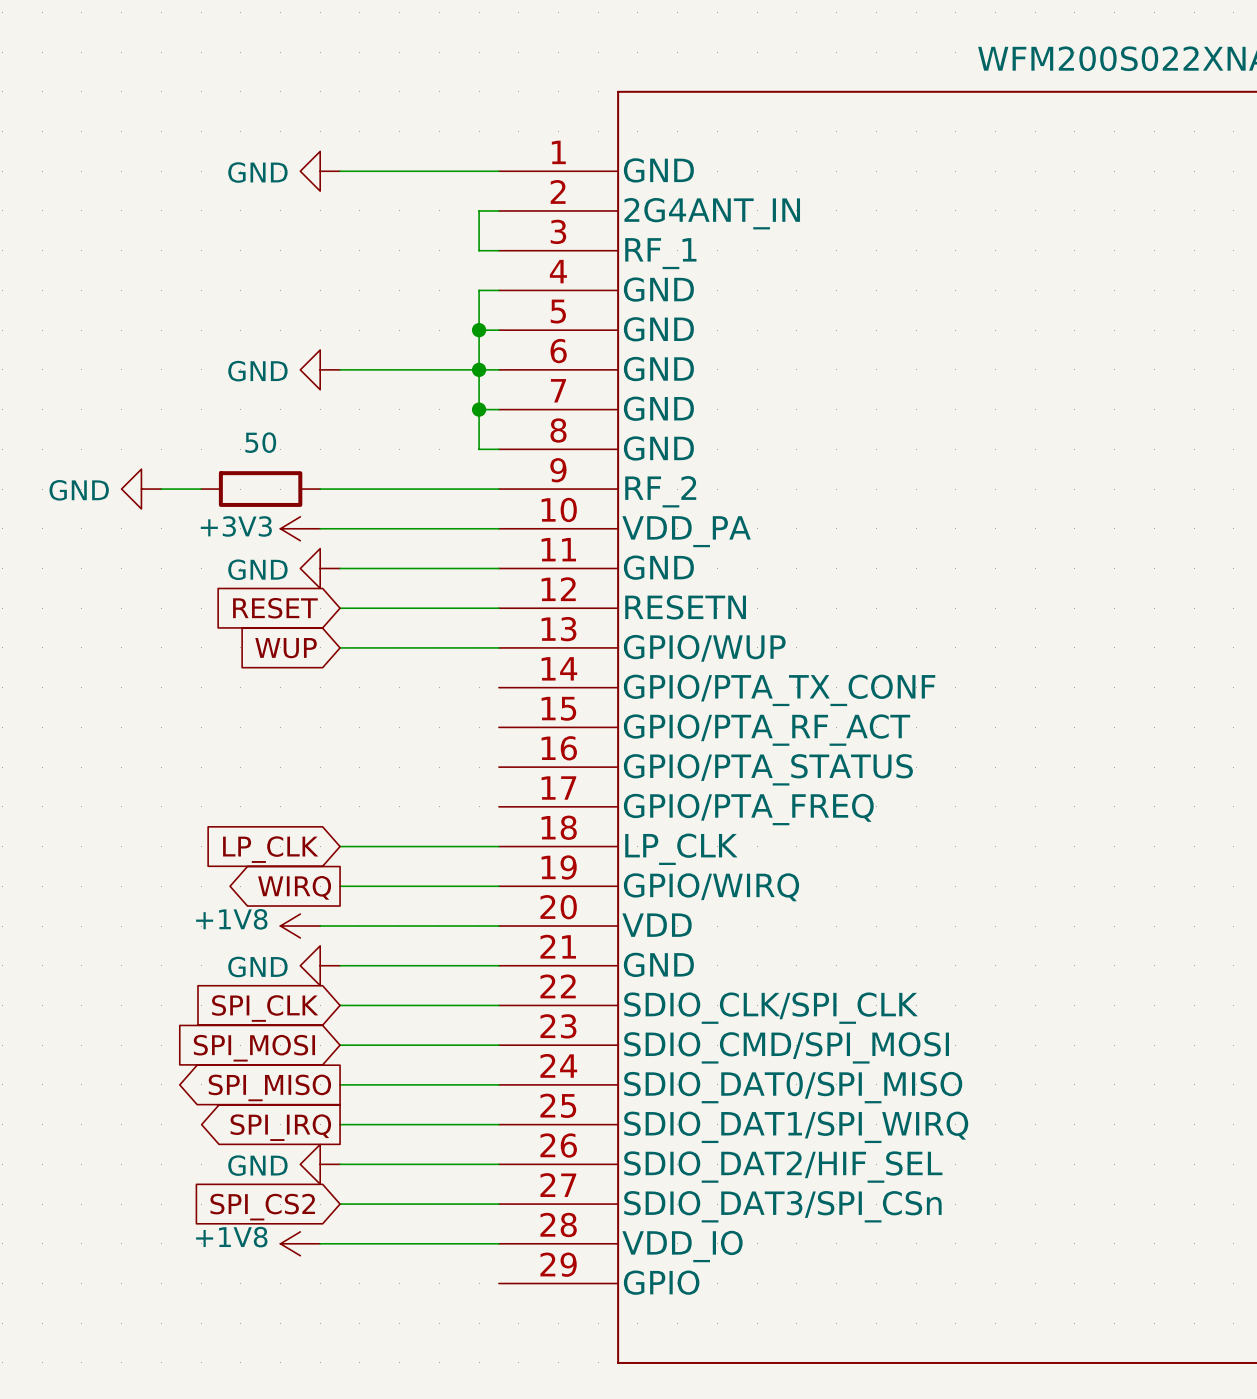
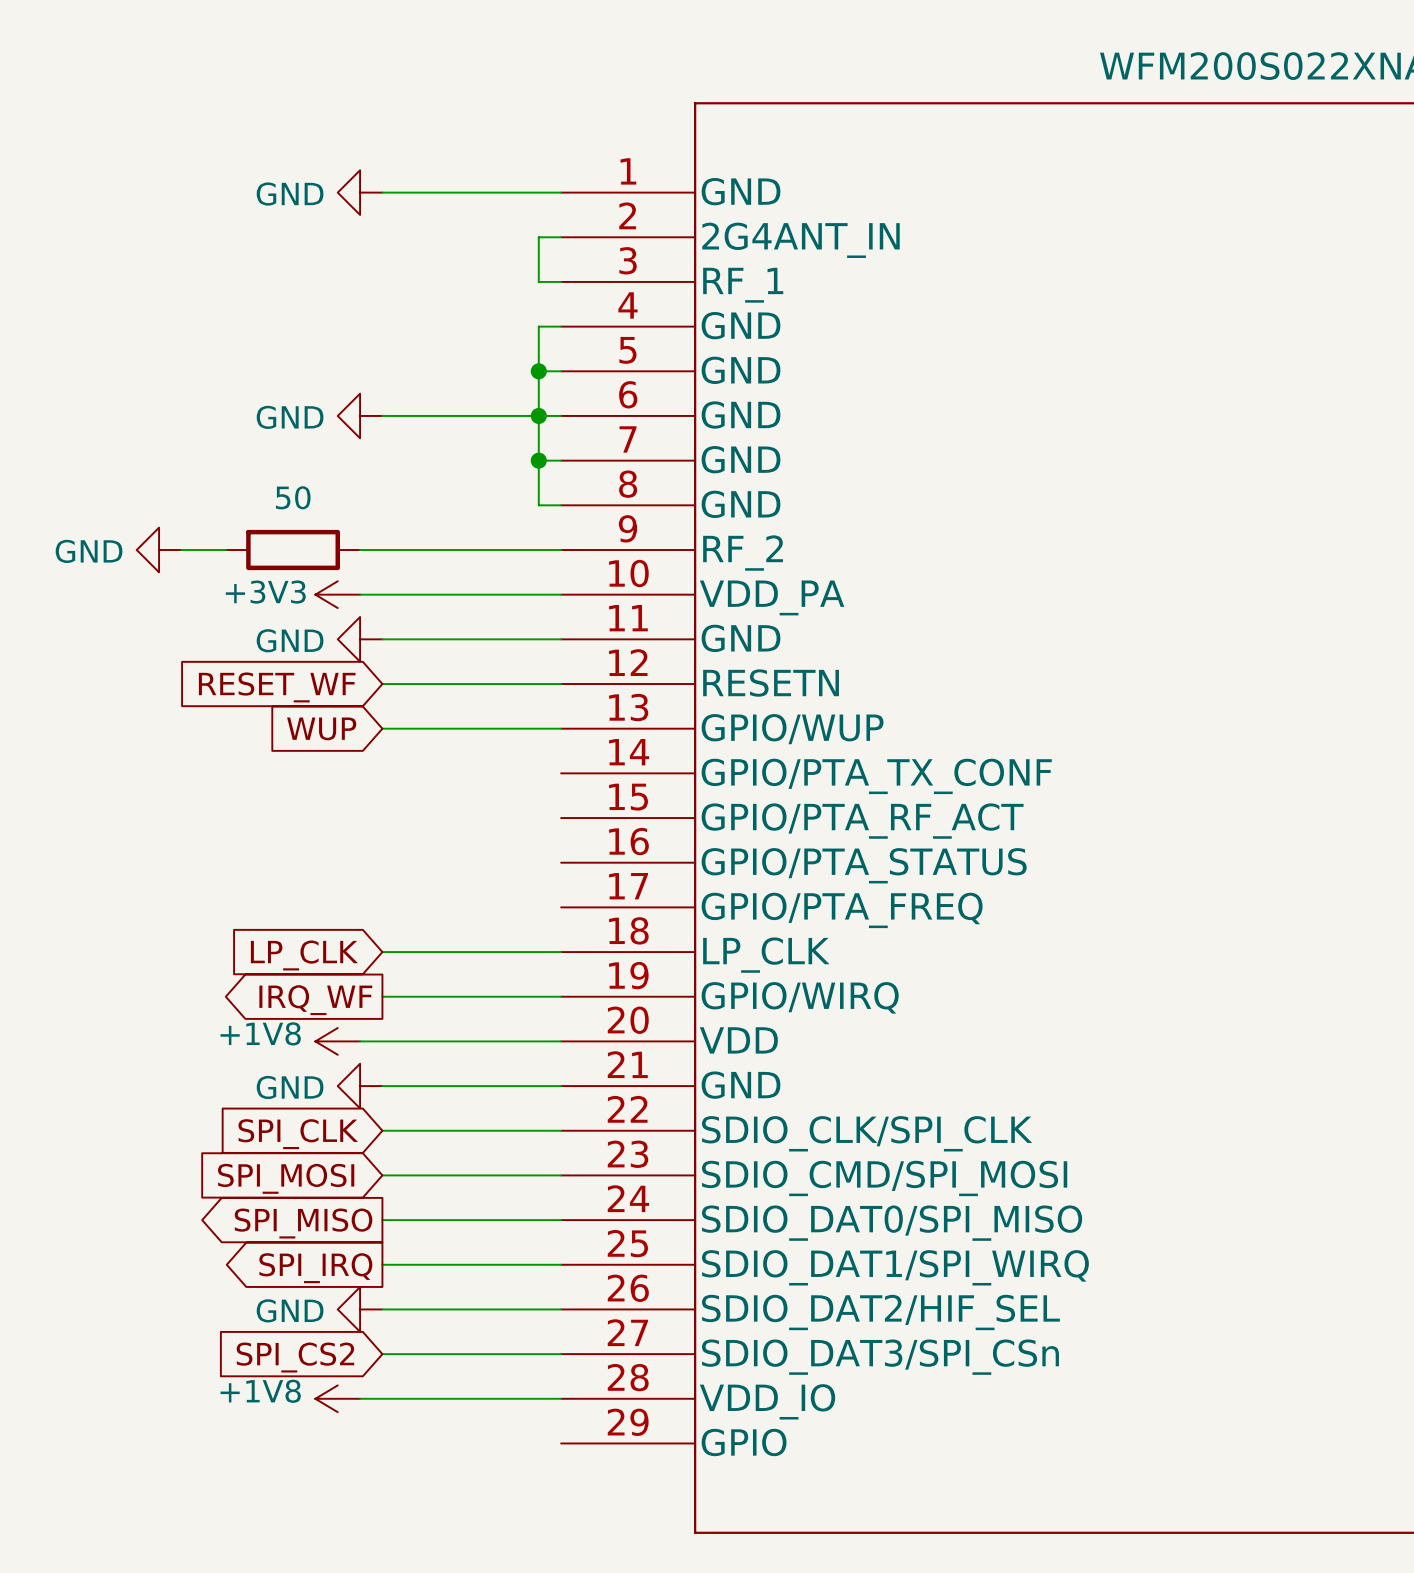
global label: RESET (275, 608) -> RESET_WF (277, 687)
global label: WIRQ (294, 887) -> IRQ_WF (315, 1000)

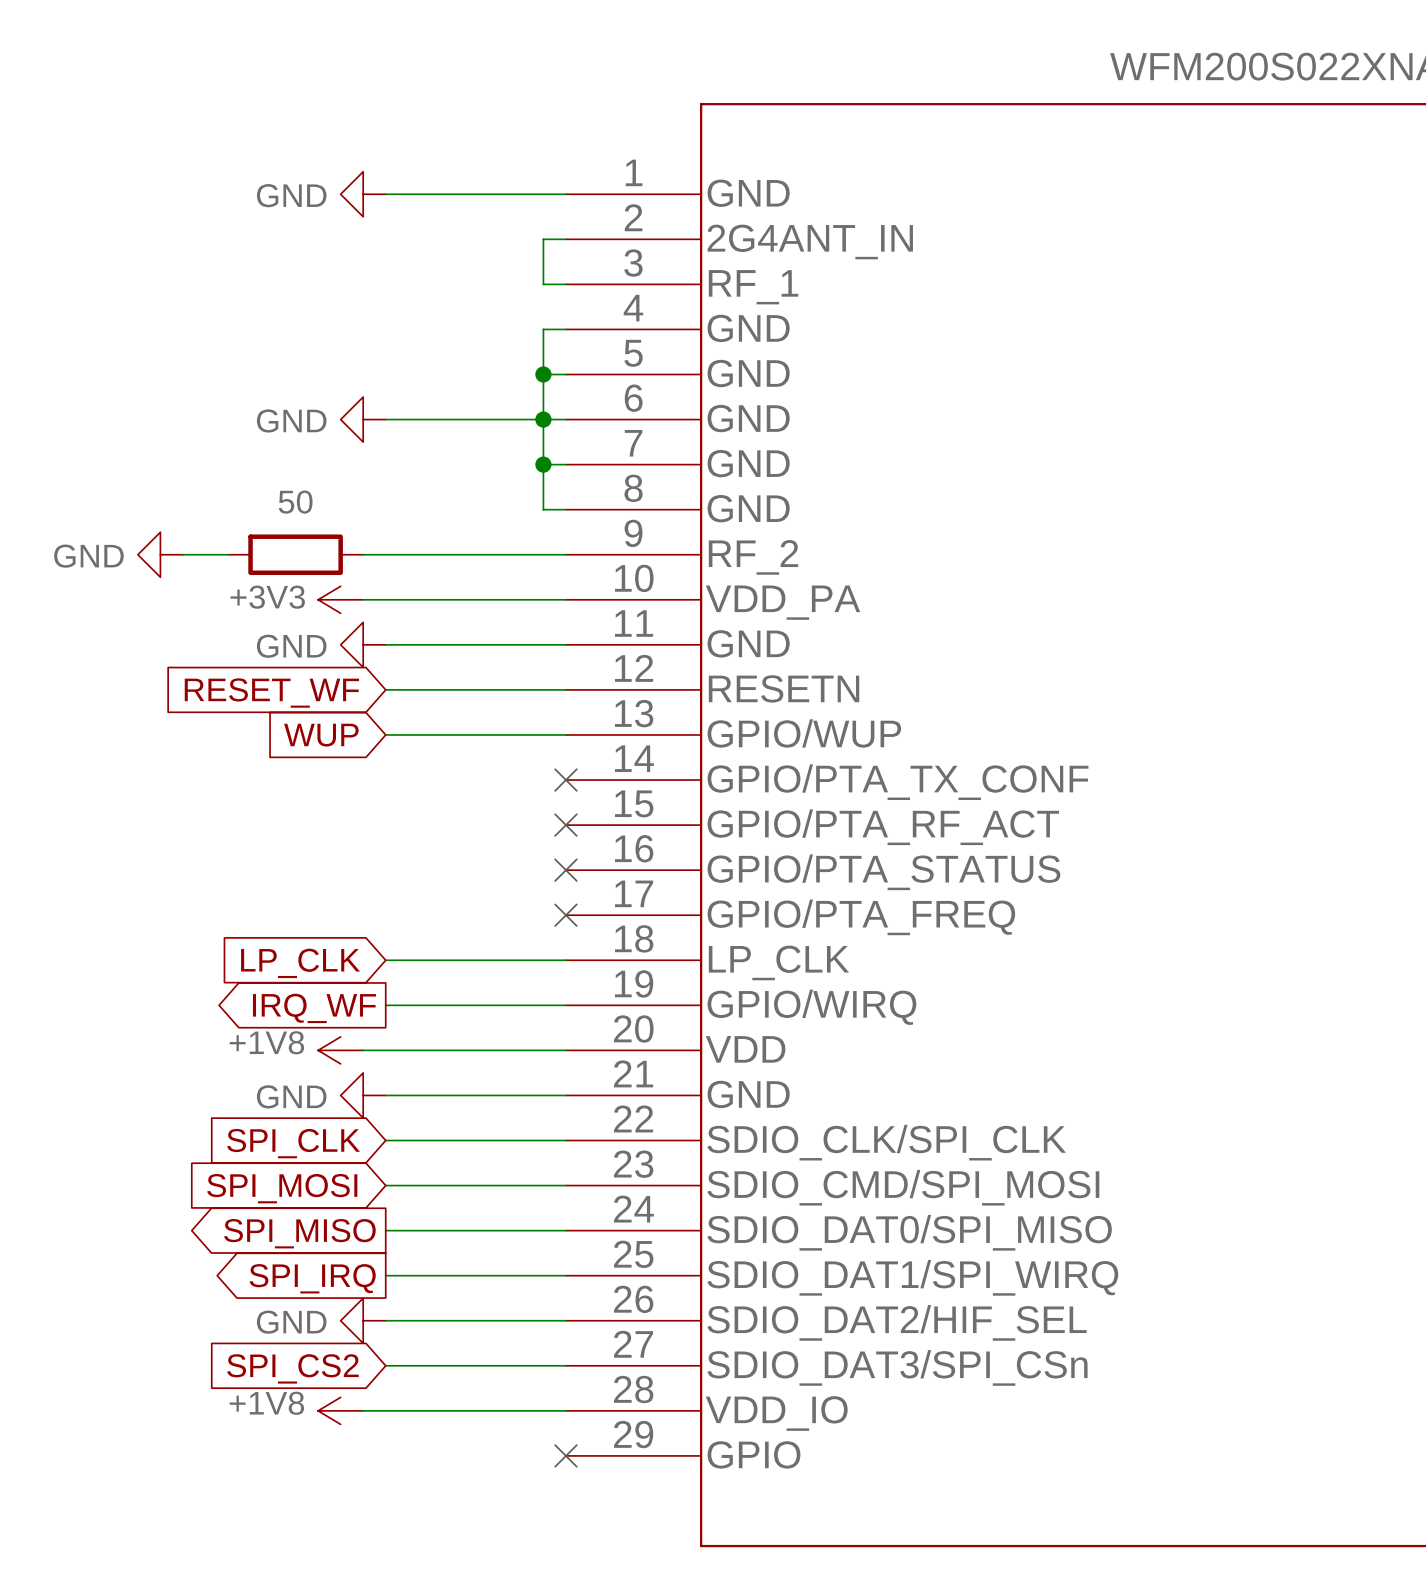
no-connect mark: none -> (565, 780)
no-connect mark: none -> (565, 825)
no-connect mark: none -> (565, 870)
no-connect mark: none -> (565, 915)
no-connect mark: none -> (565, 1455)

